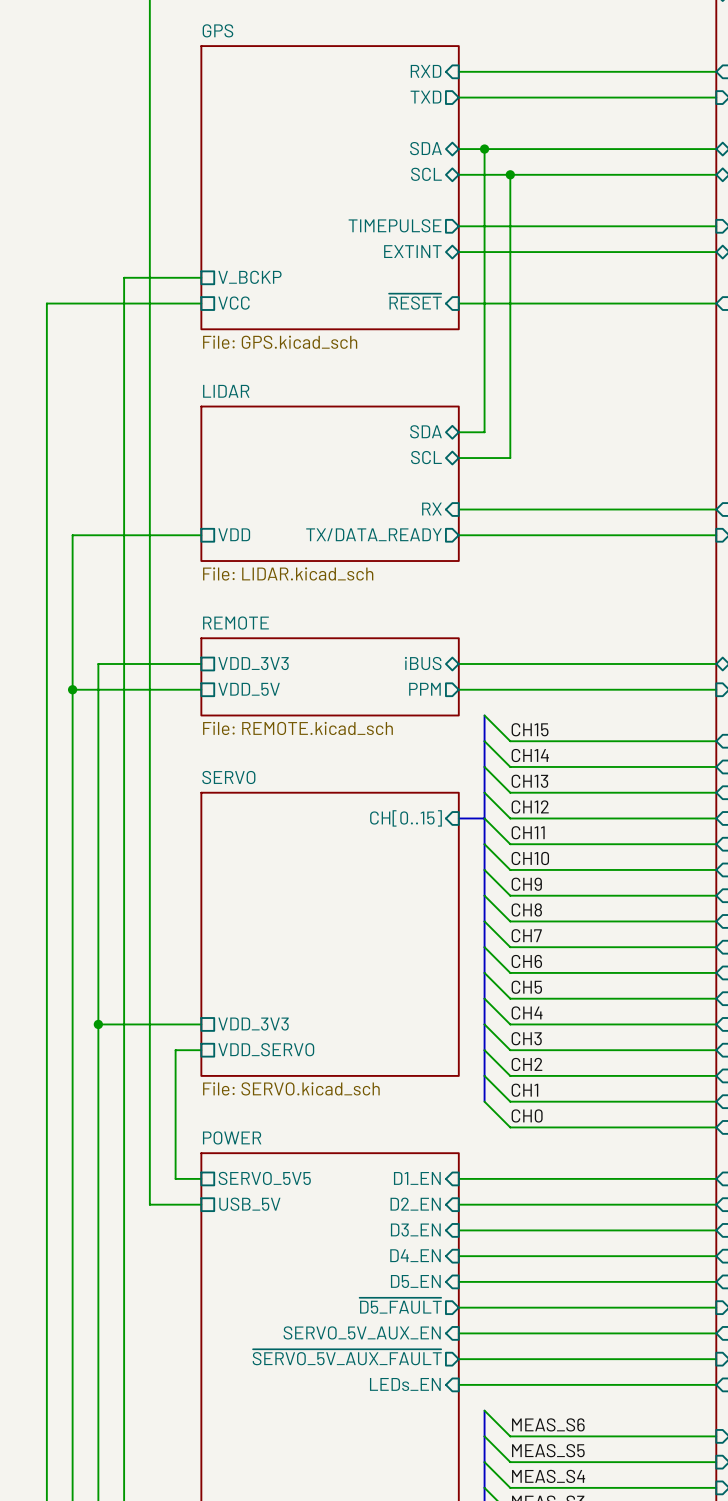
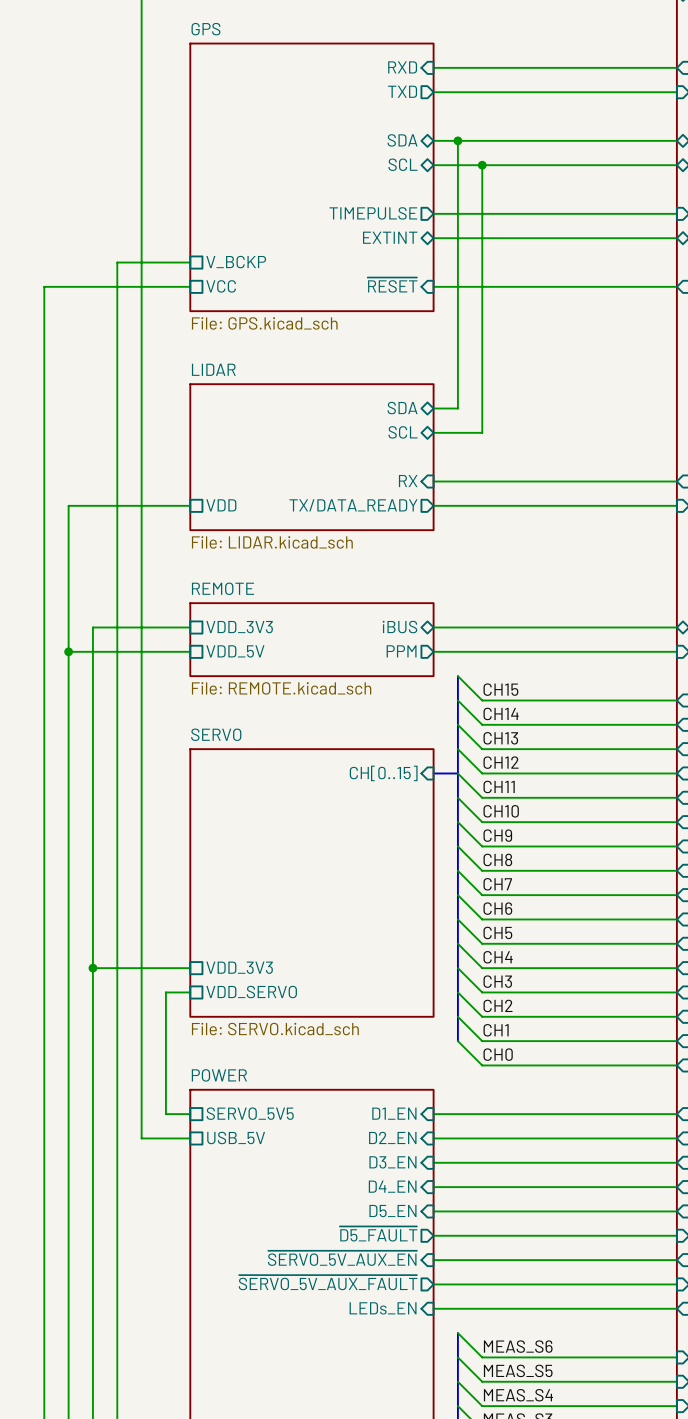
sheet pin: SERVO_5V_AUX_EN (362, 1332) -> ~{SERVO_5V_AUX_EN} (342, 1258)

